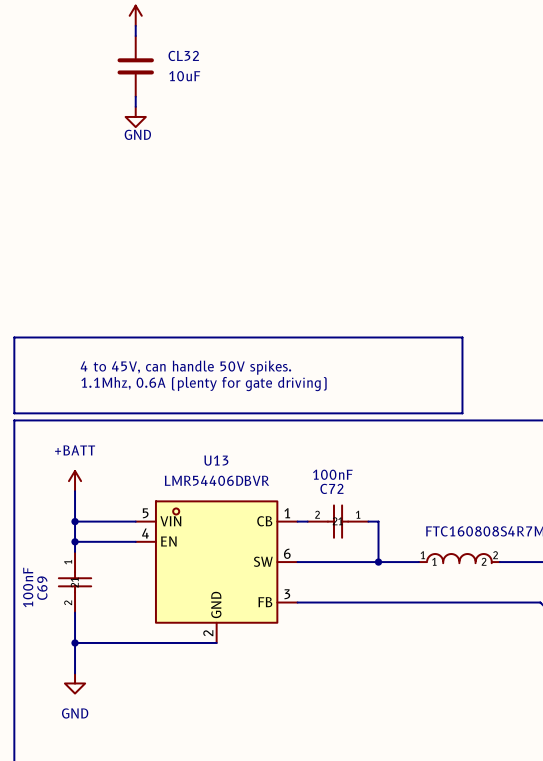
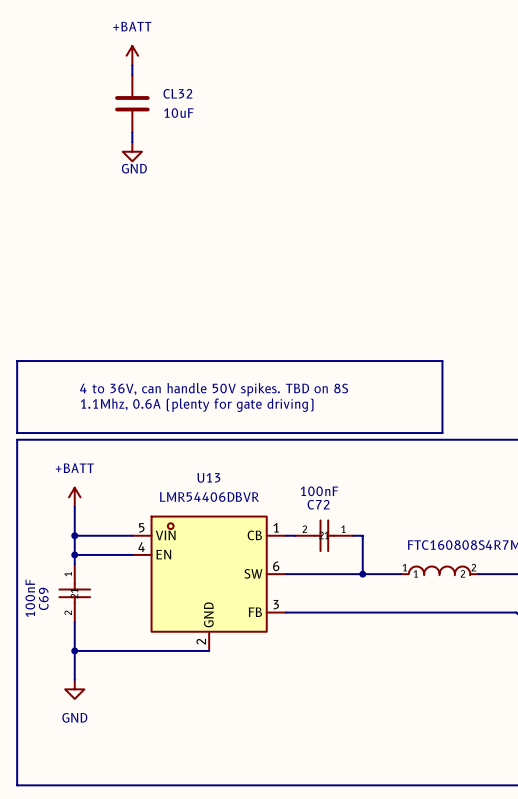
text: 4 to 45V, can handle 50V spikes. (185, 367) -> 4 to 36V, can handle 50V spikes. TBD on 8S (214, 389)

